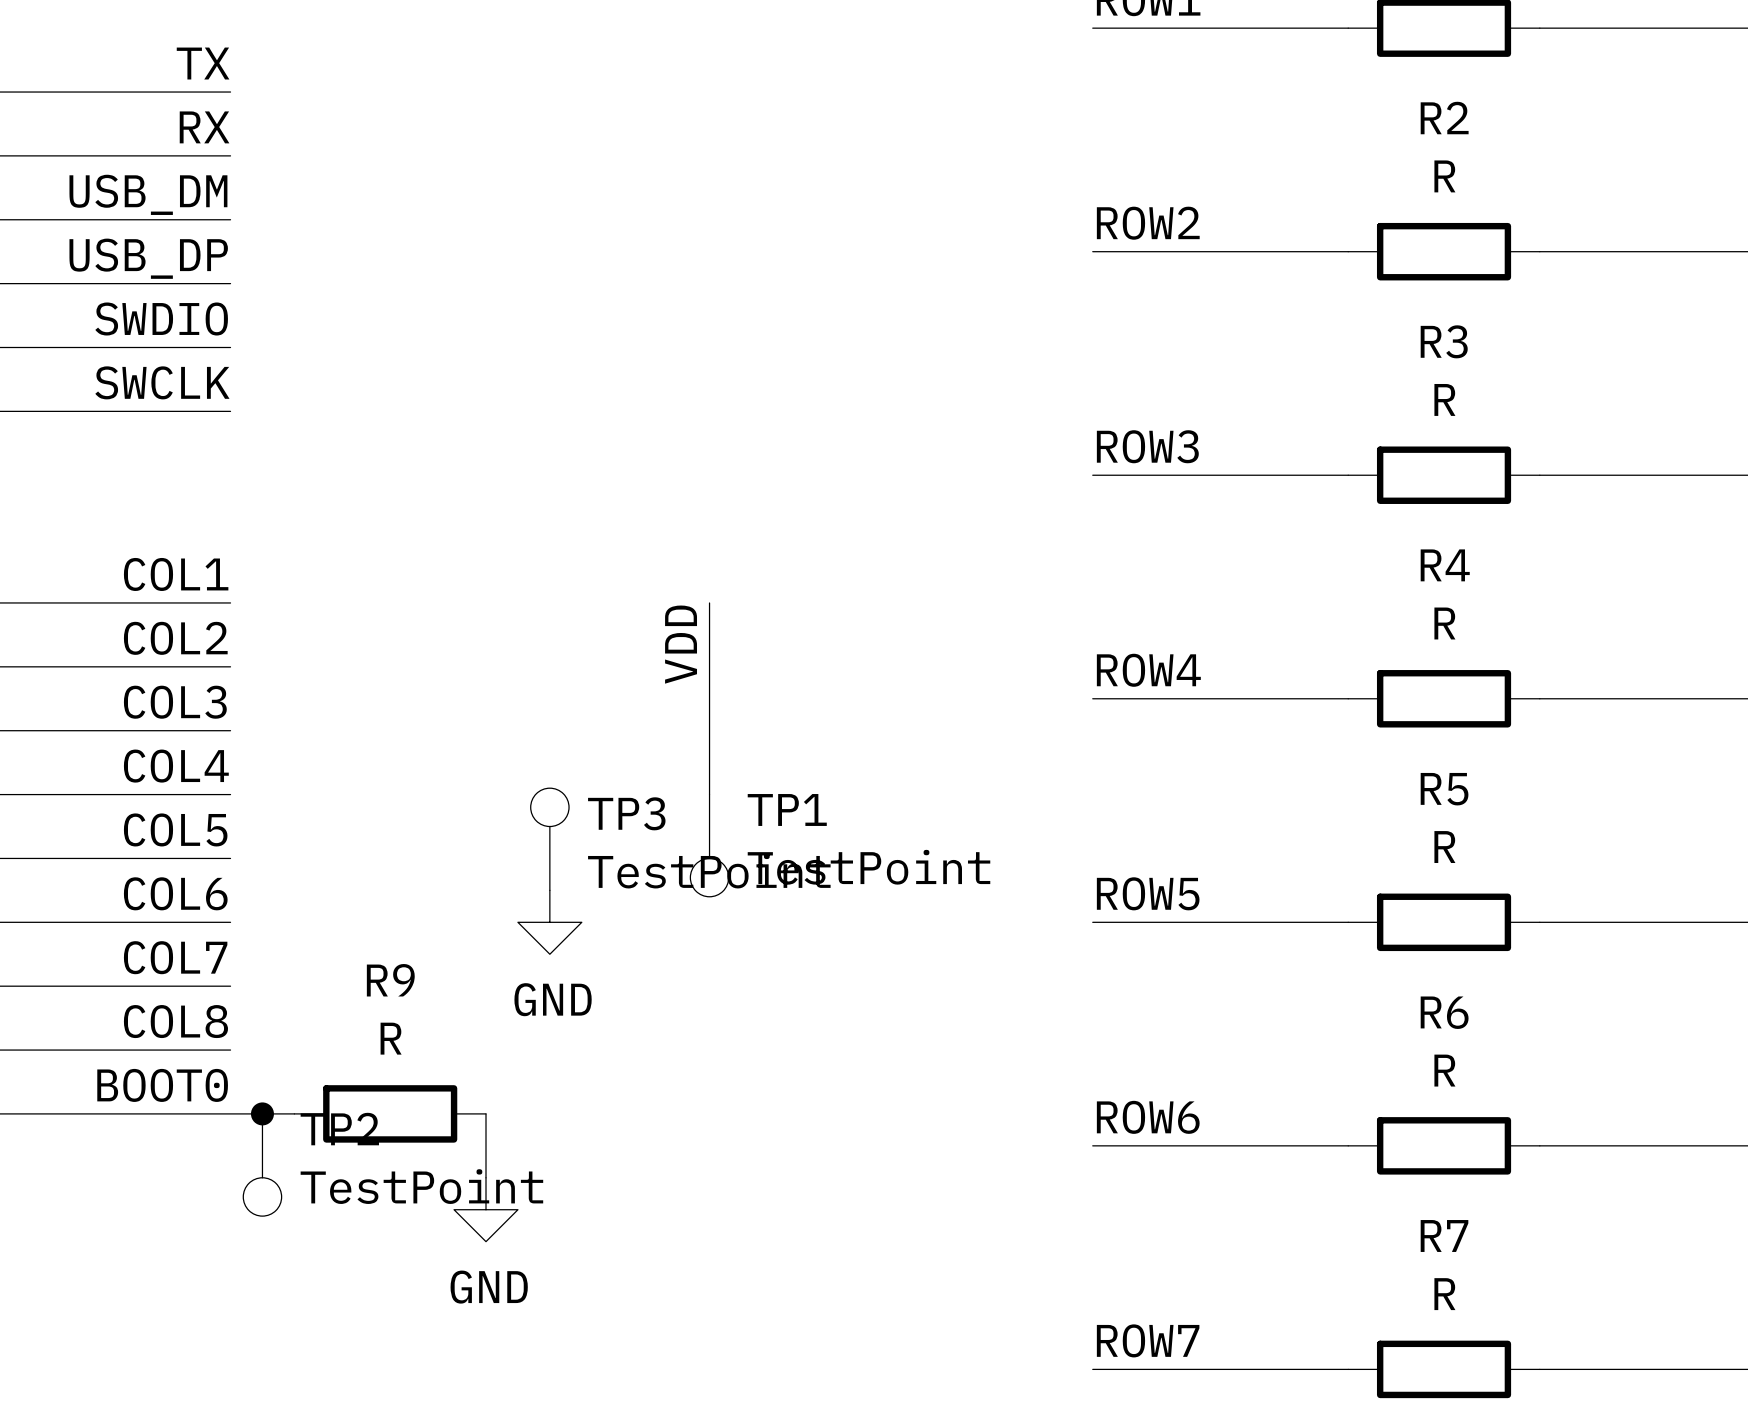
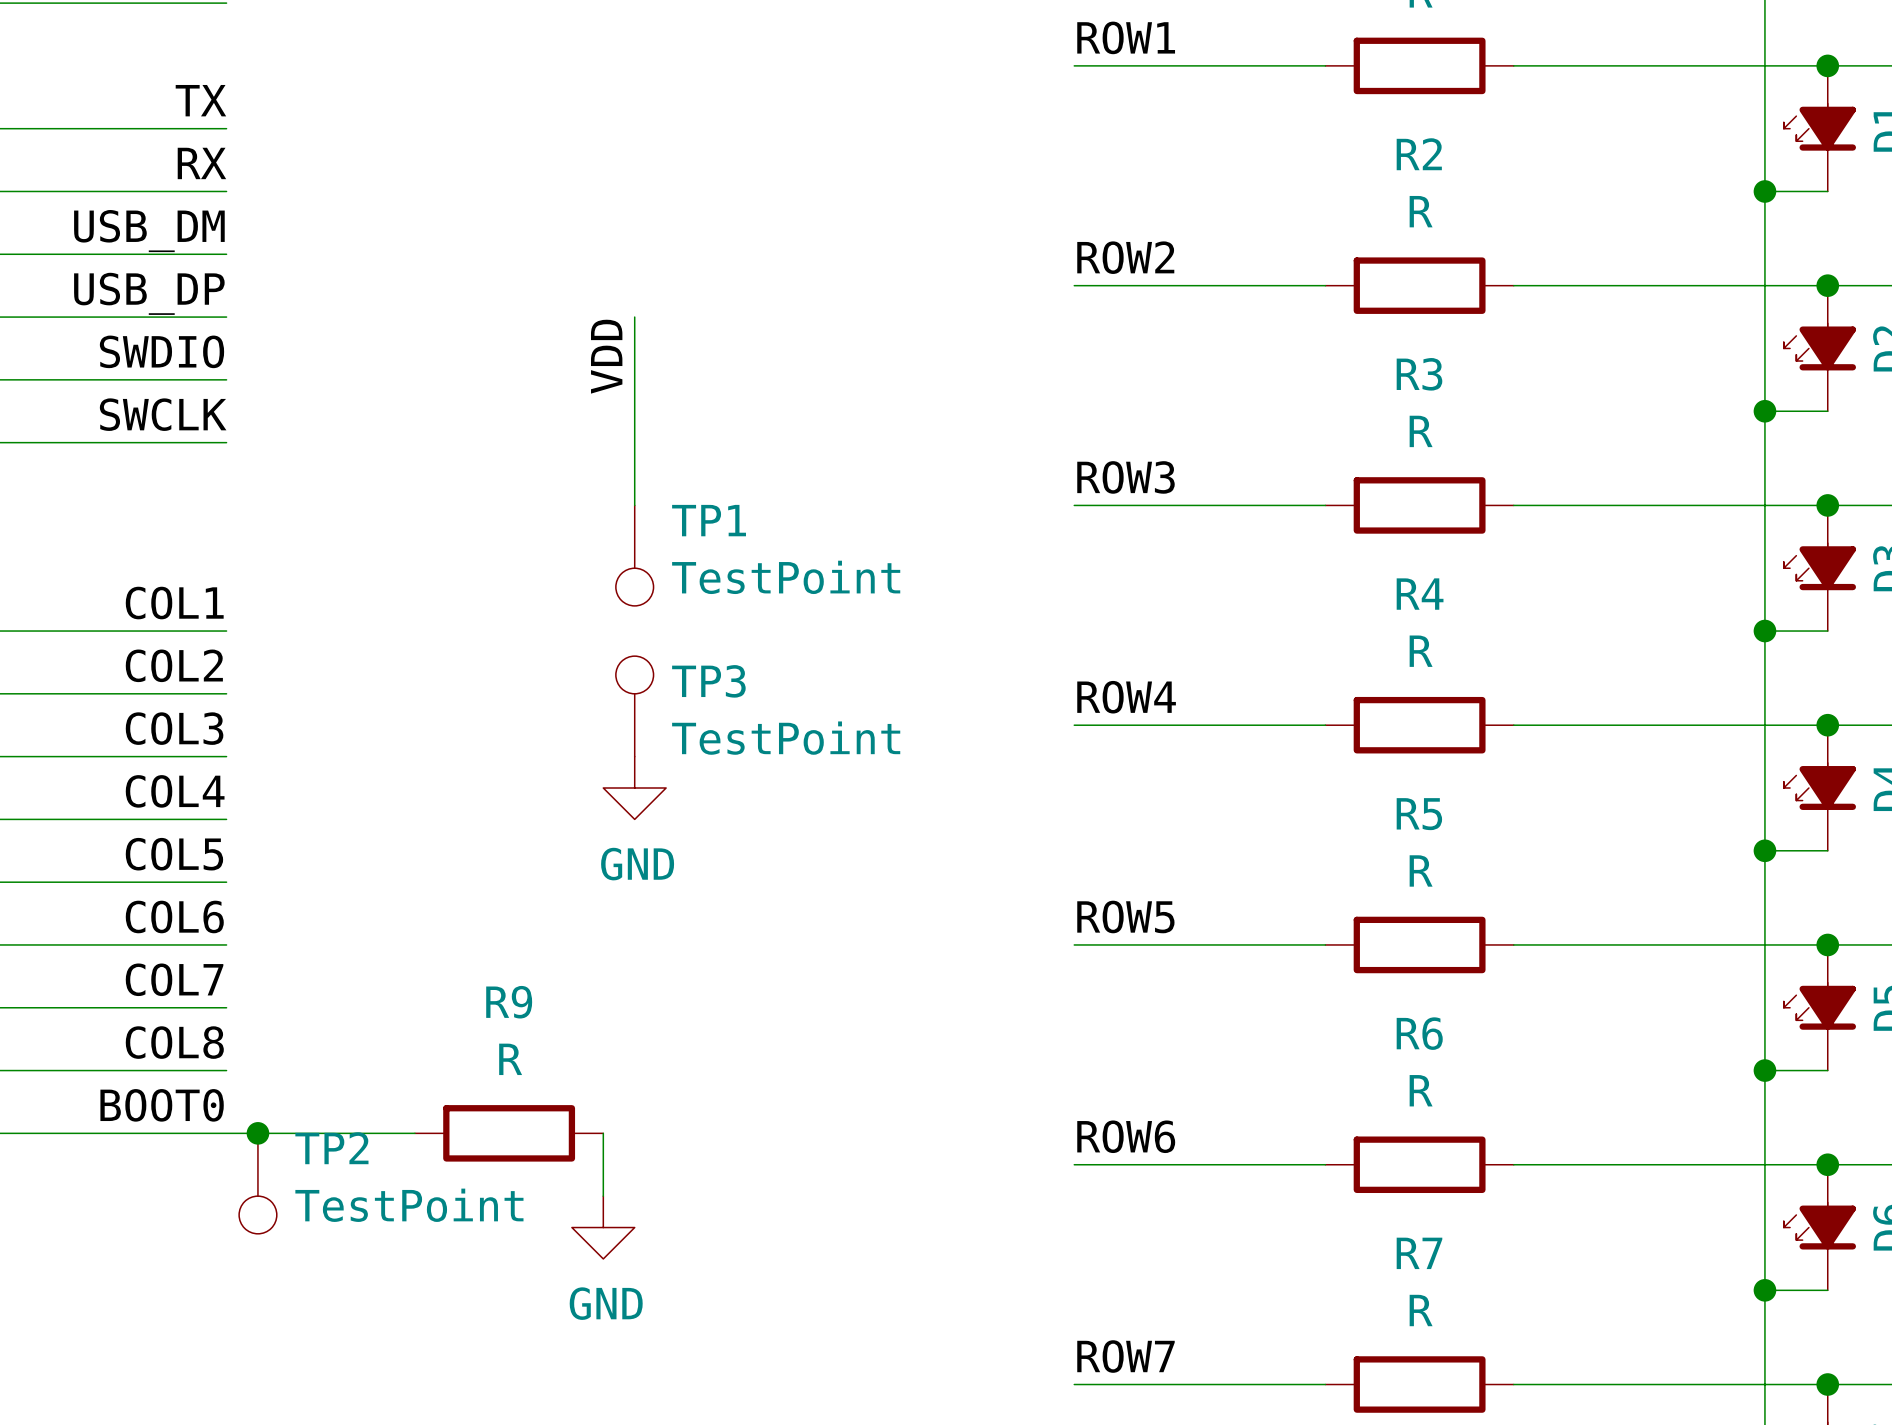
wire: (709, 602) (709, 794) -> (634, 317) (634, 505)
label position: VDD (681, 644) -> VDD (606, 356)
power symbol: none -> GND (634, 788)
TP3 position: (549, 839) -> (634, 706)
TP1 position: (709, 845) -> (634, 555)
power symbol: GND (549, 922) -> none
wire: none -> (289, 1133) (414, 1133)
R9 position: (390, 1113) -> (509, 1133)
wire: (486, 1113) (486, 1177) -> (603, 1133) (603, 1196)
power symbol position: GND (486, 1209) -> GND (603, 1227)

